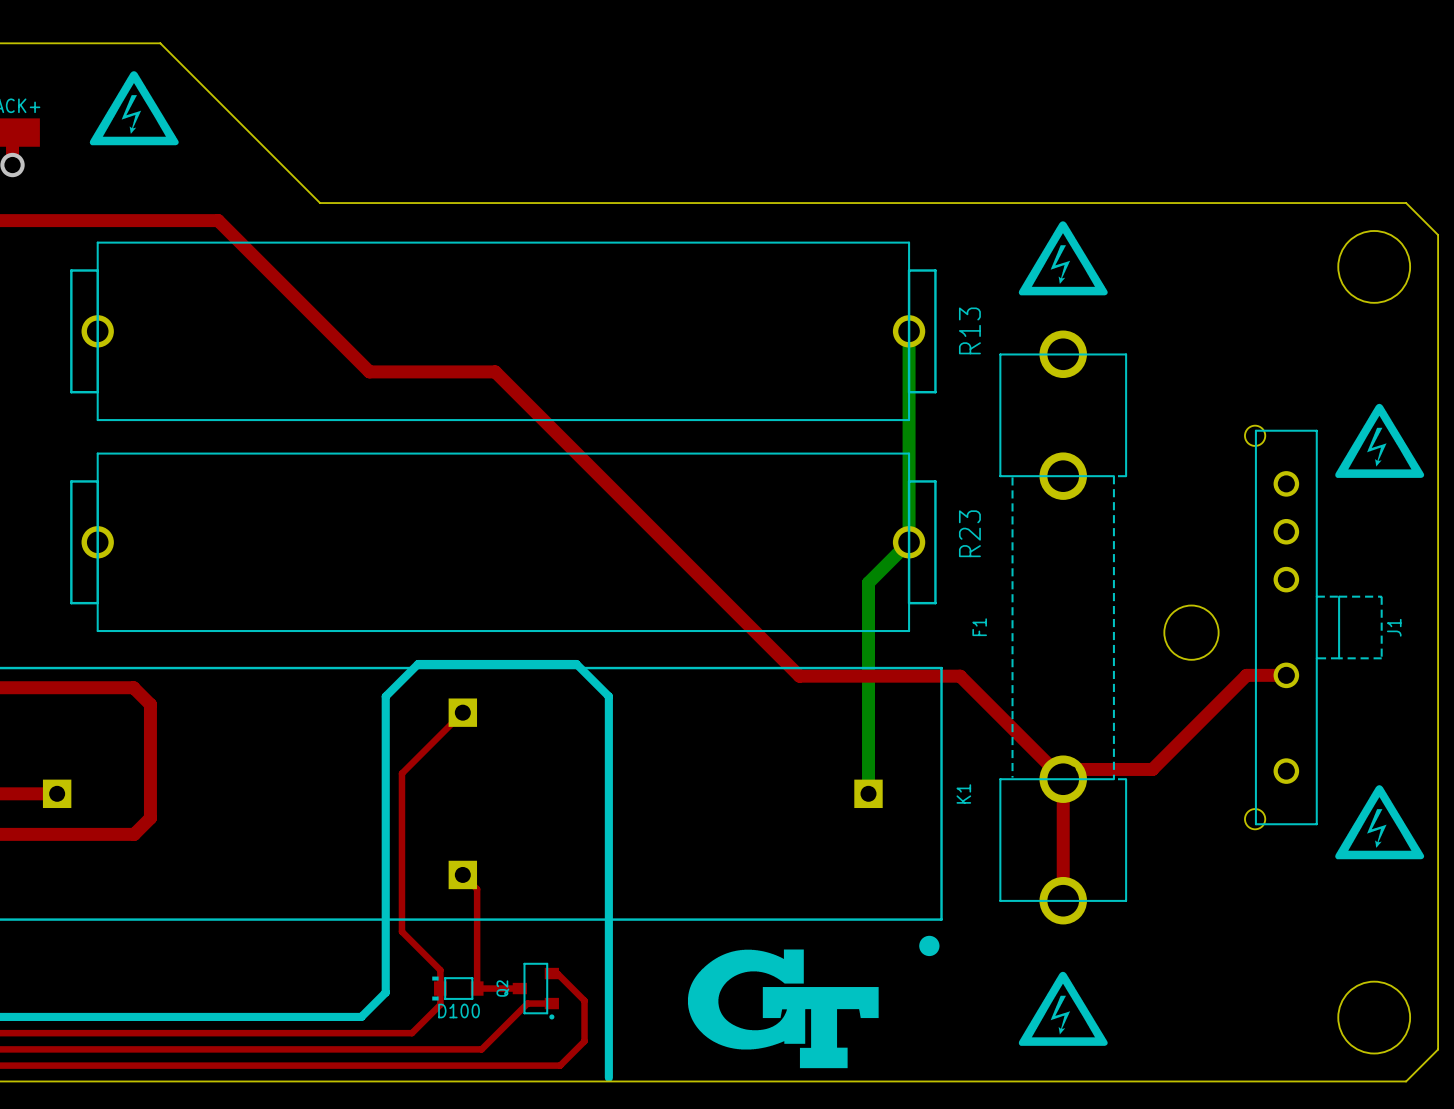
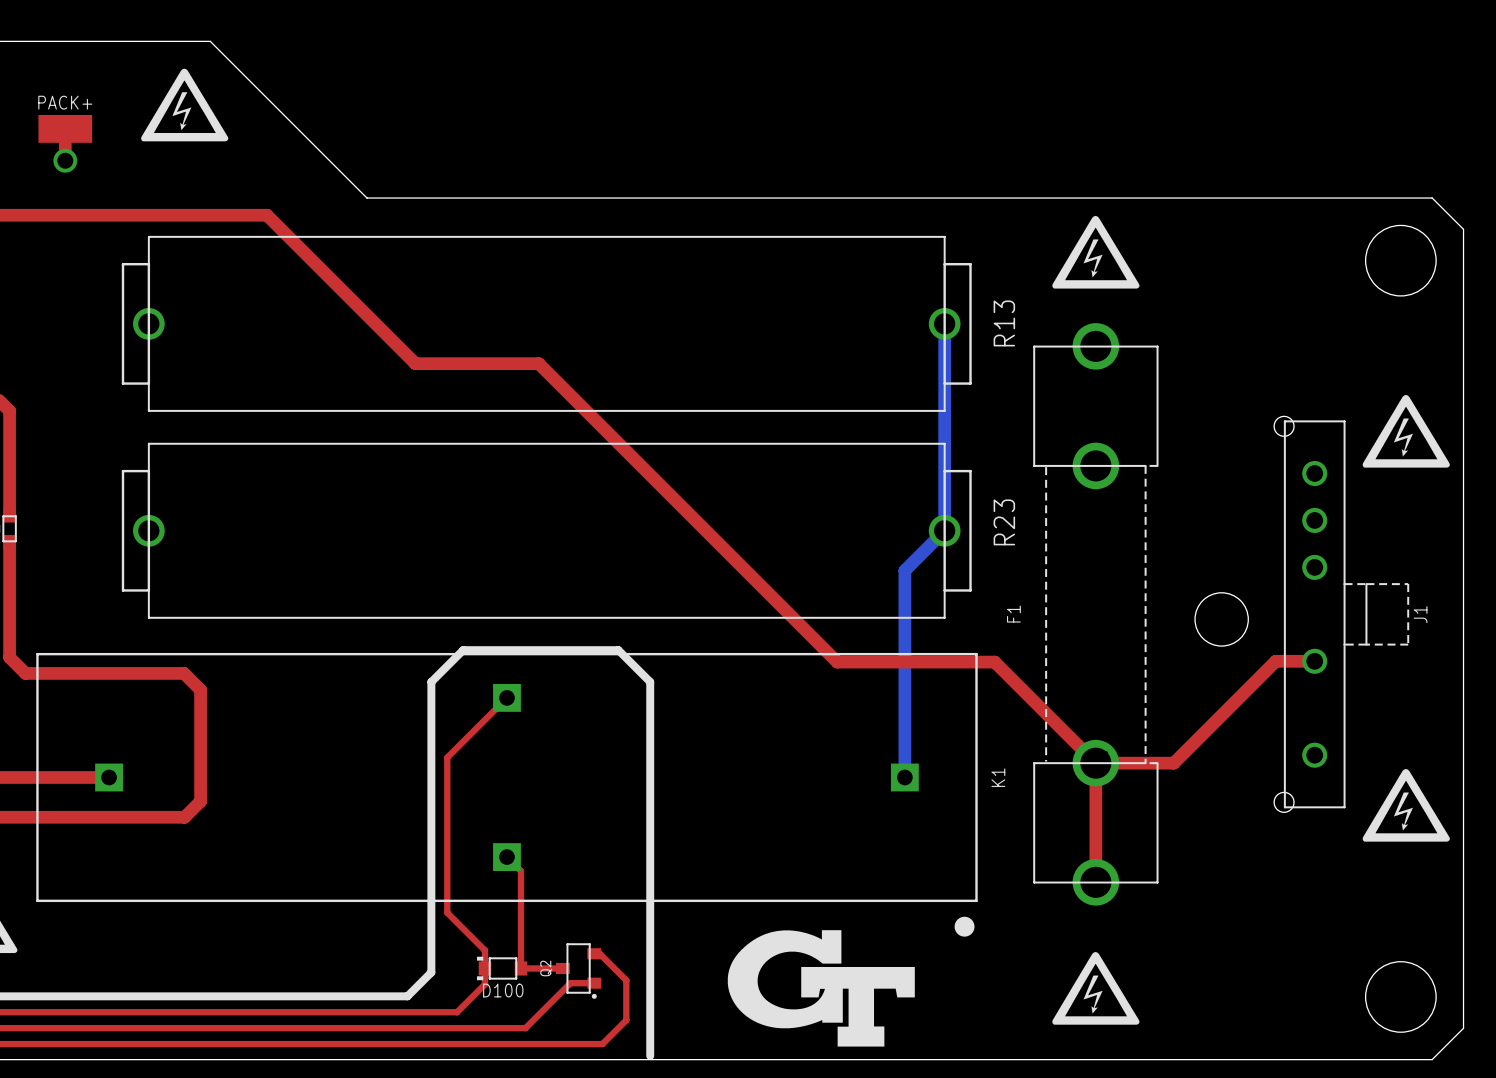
top track: (1072, 769) (1152, 769) -> (1095, 763) (1173, 763) (1183, 753)

